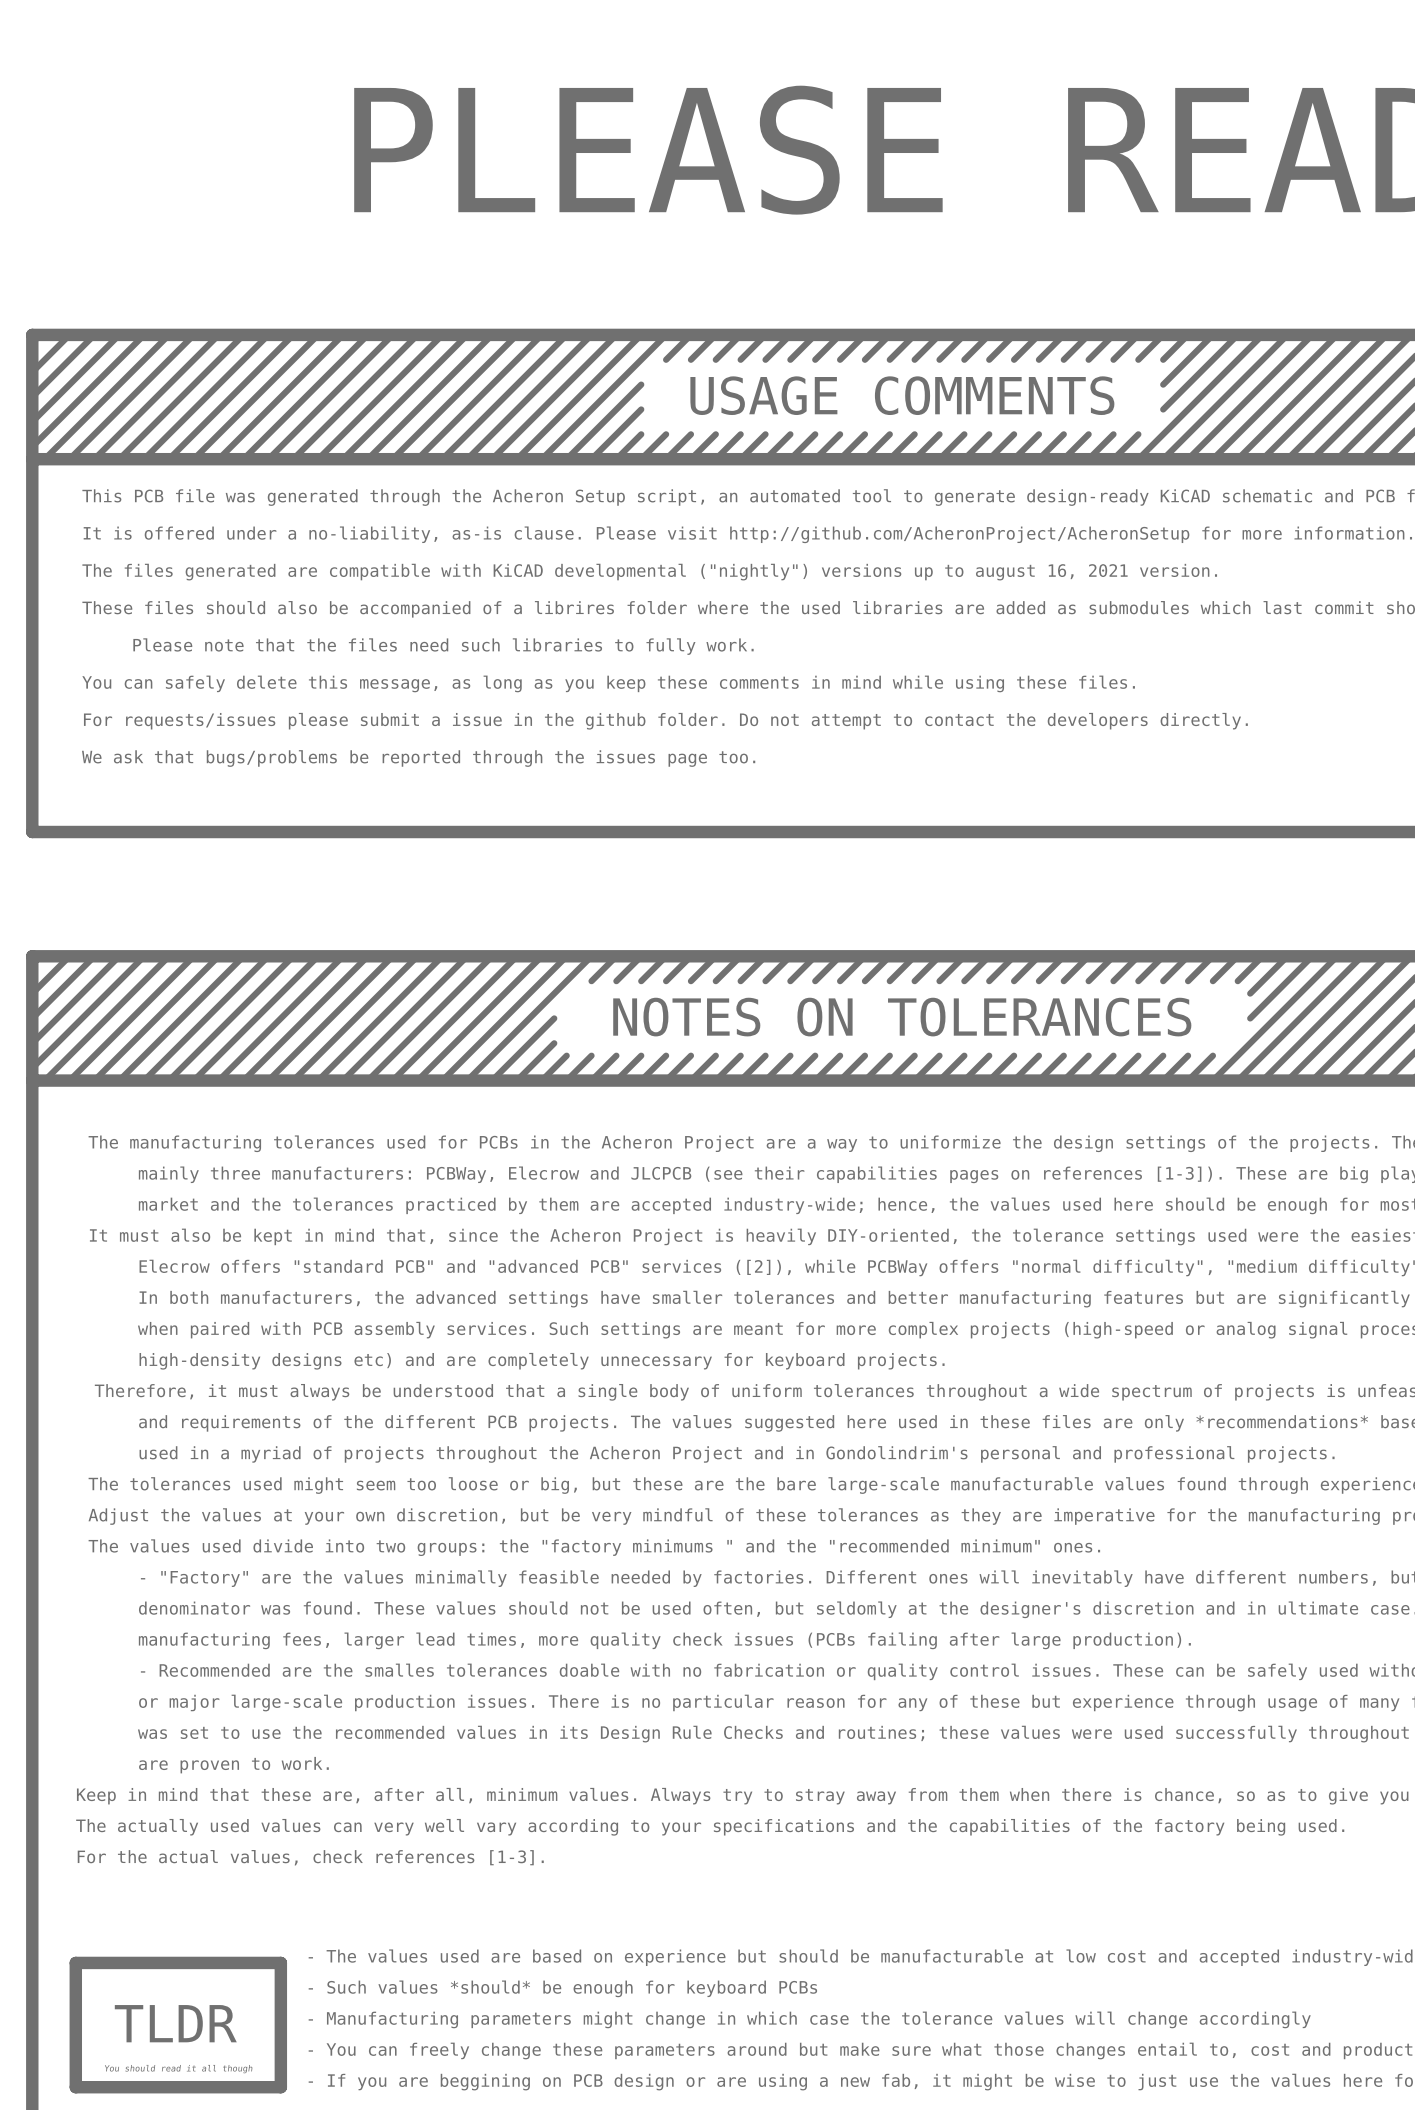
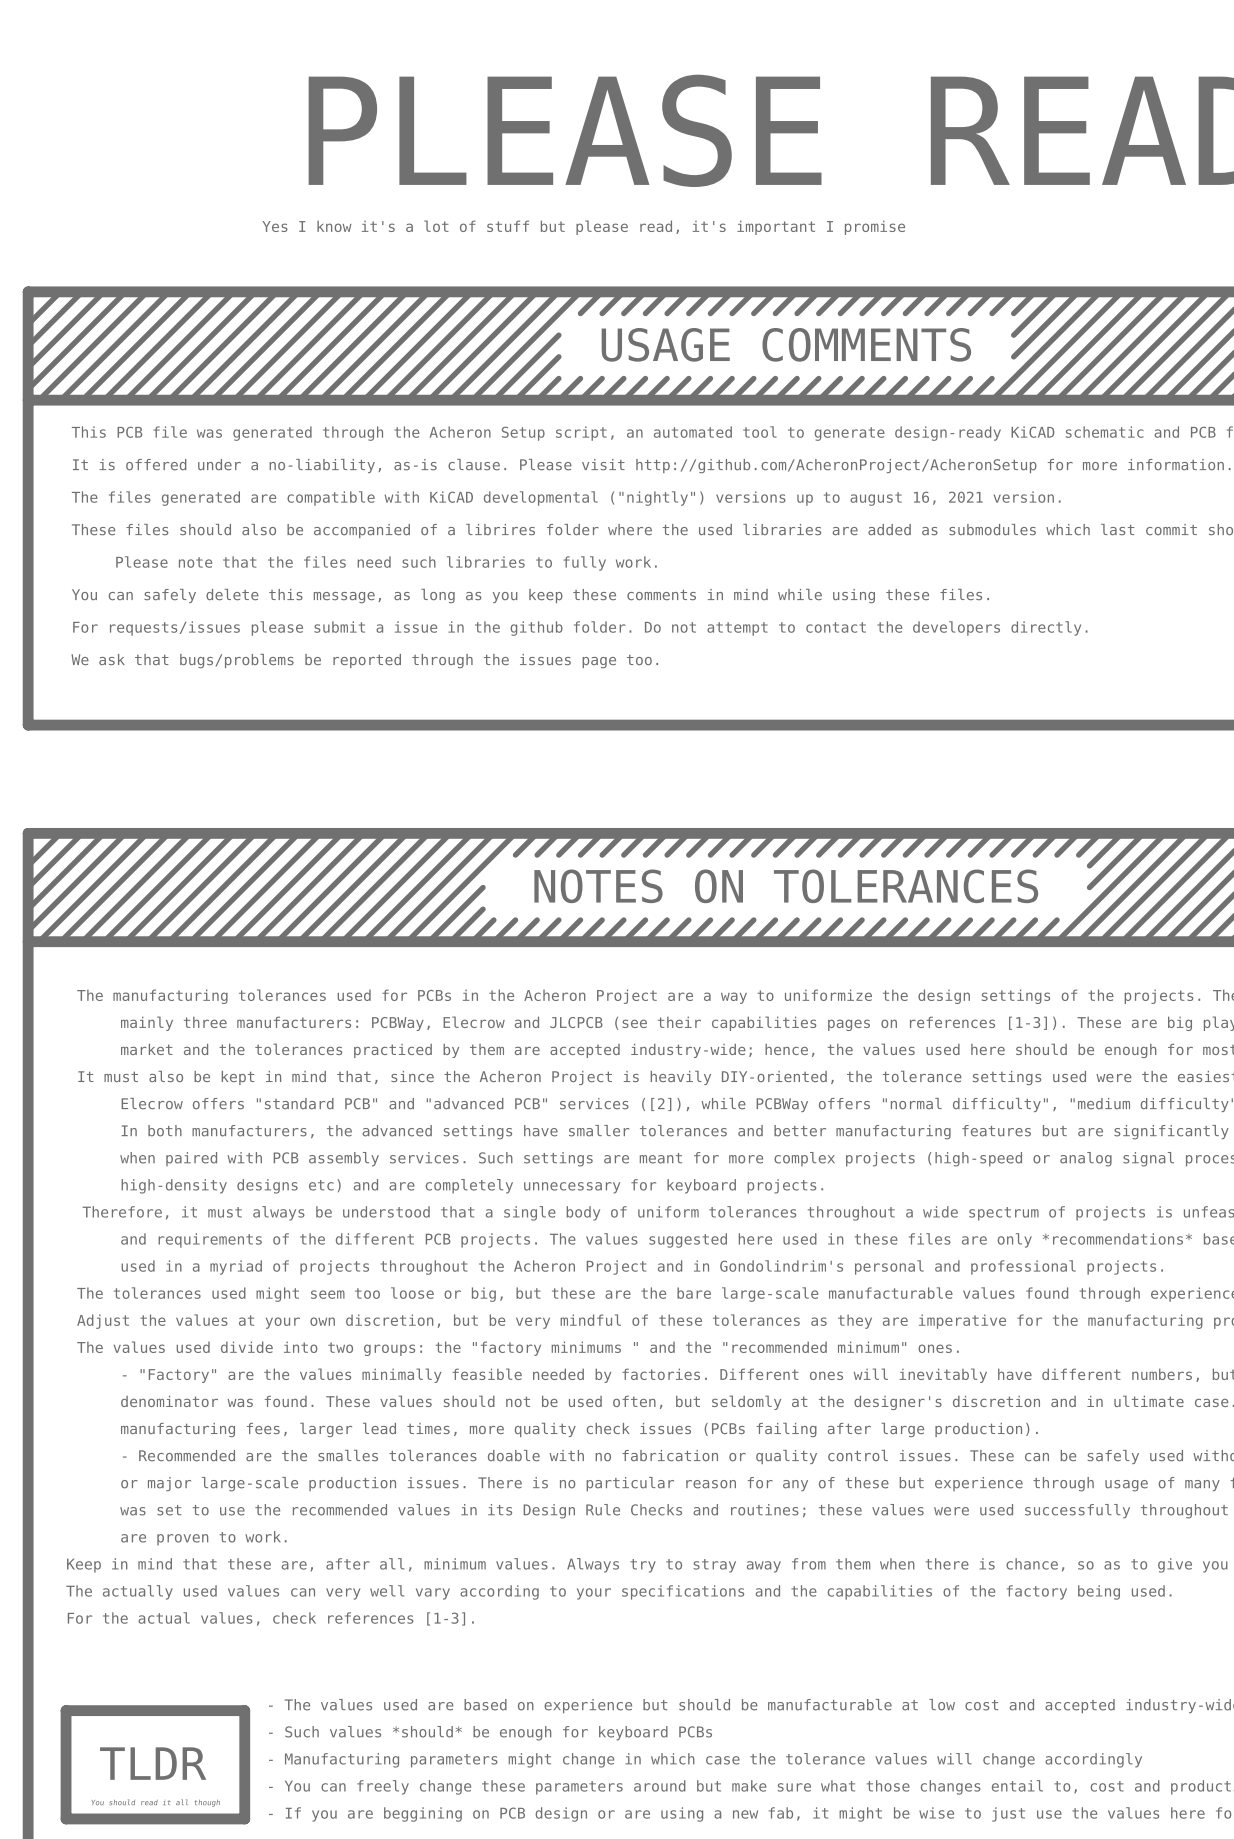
text: none -> Yes I know it's a lot of stuff but please read, it's important I promise (583, 227)

